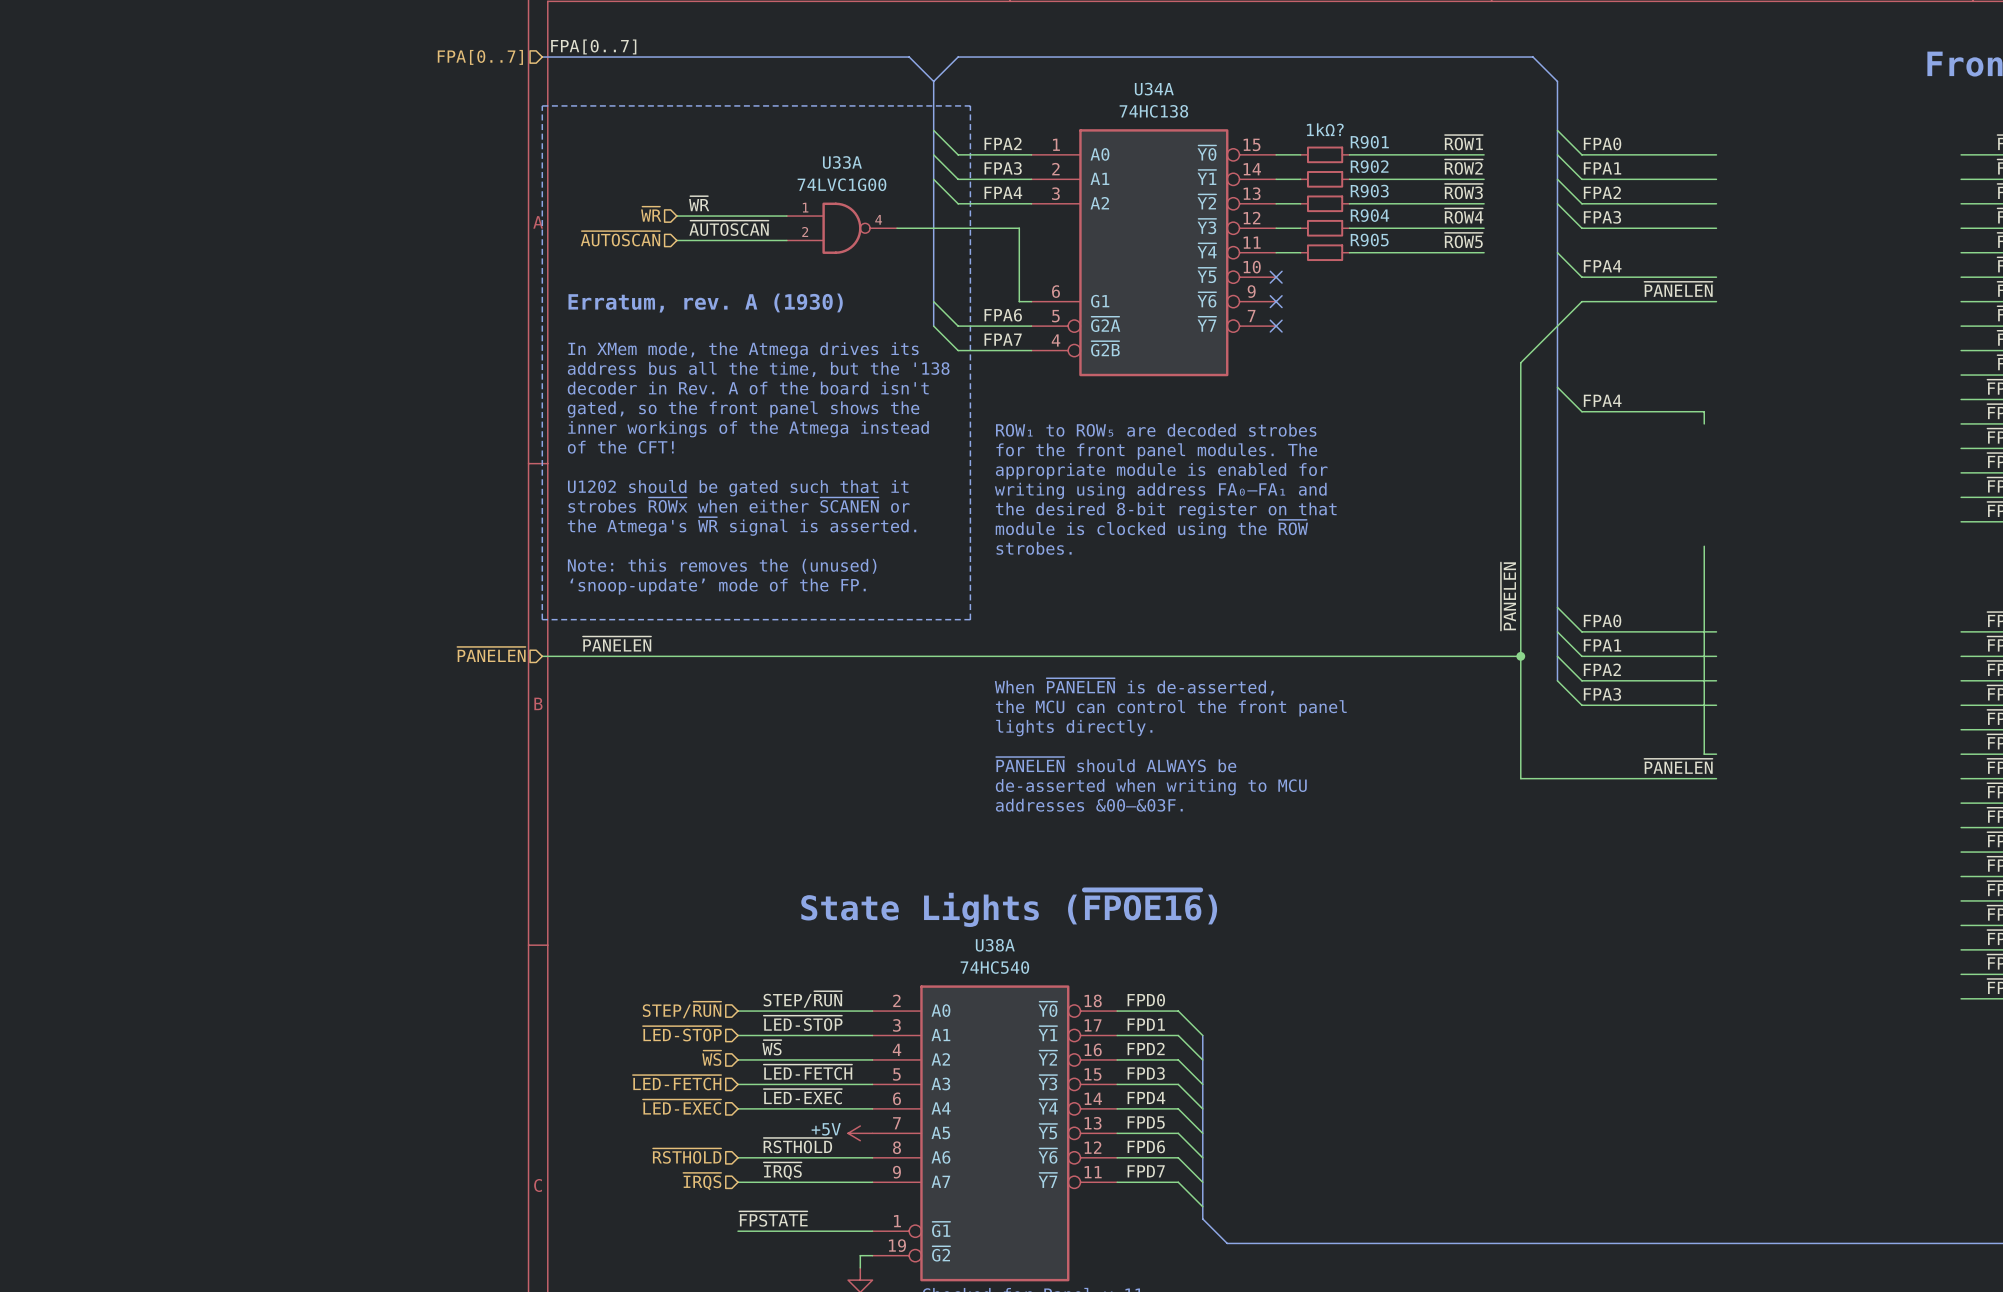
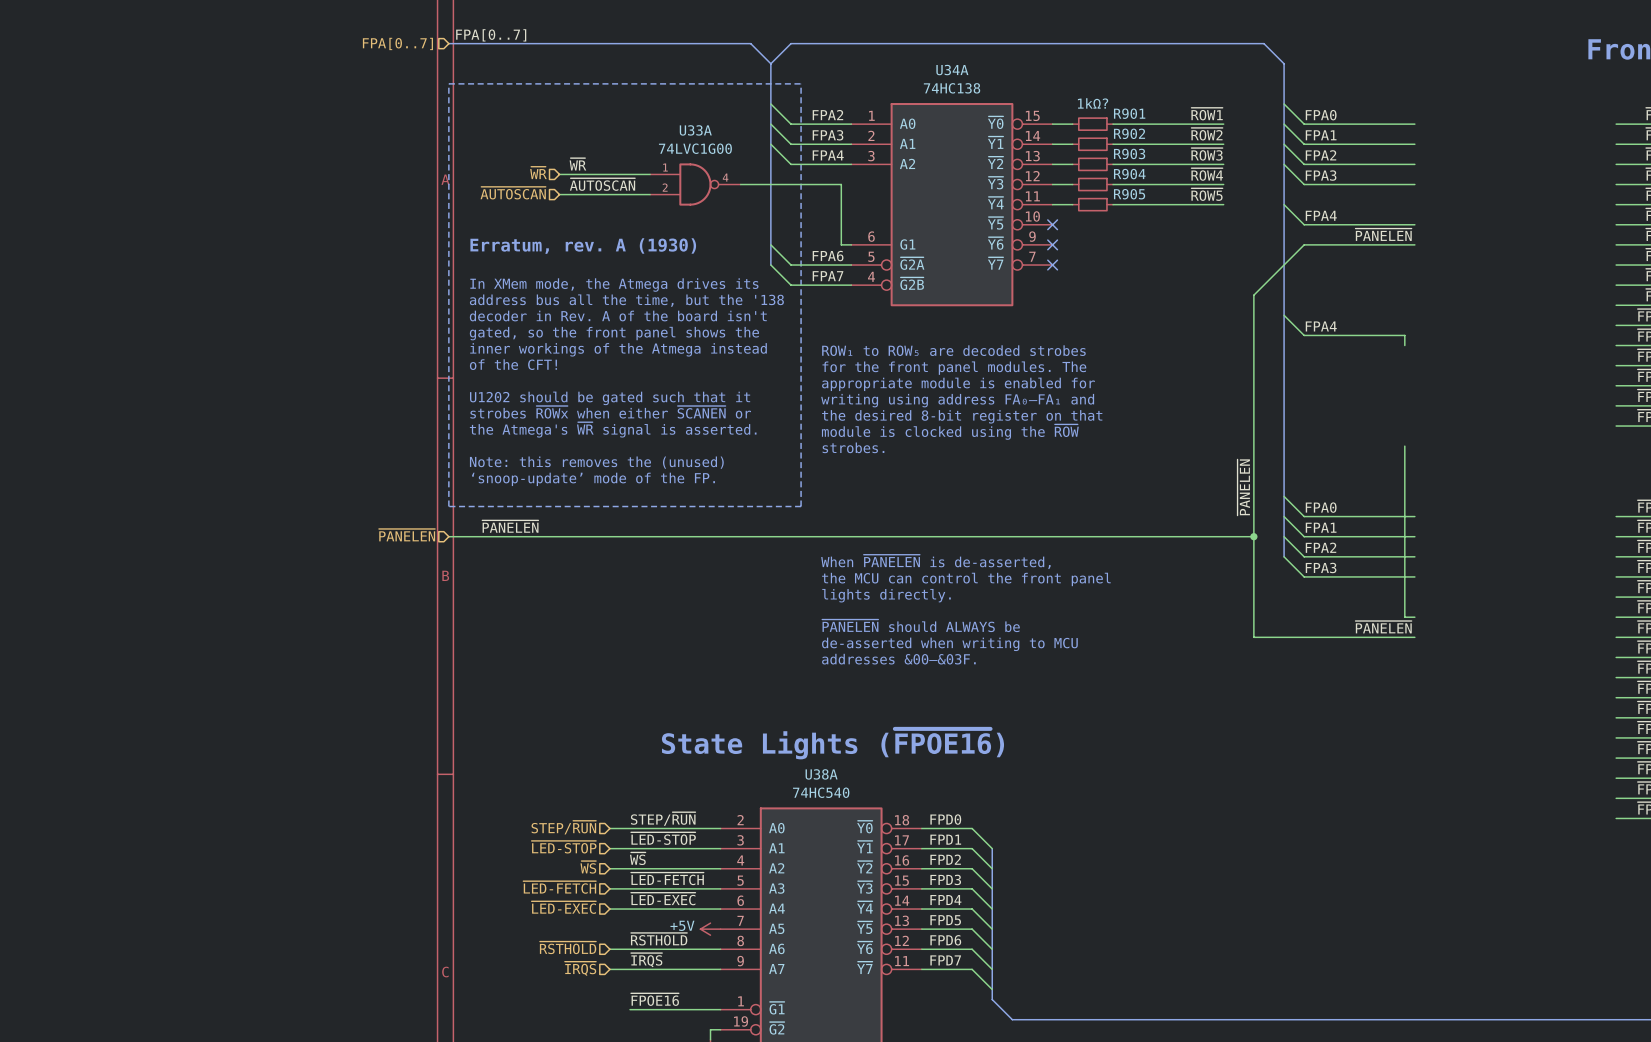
label: ~{FPSTATE} (773, 1219) -> ~{FPOE16} (654, 999)
wire: (737, 1231) (762, 1231) -> none

